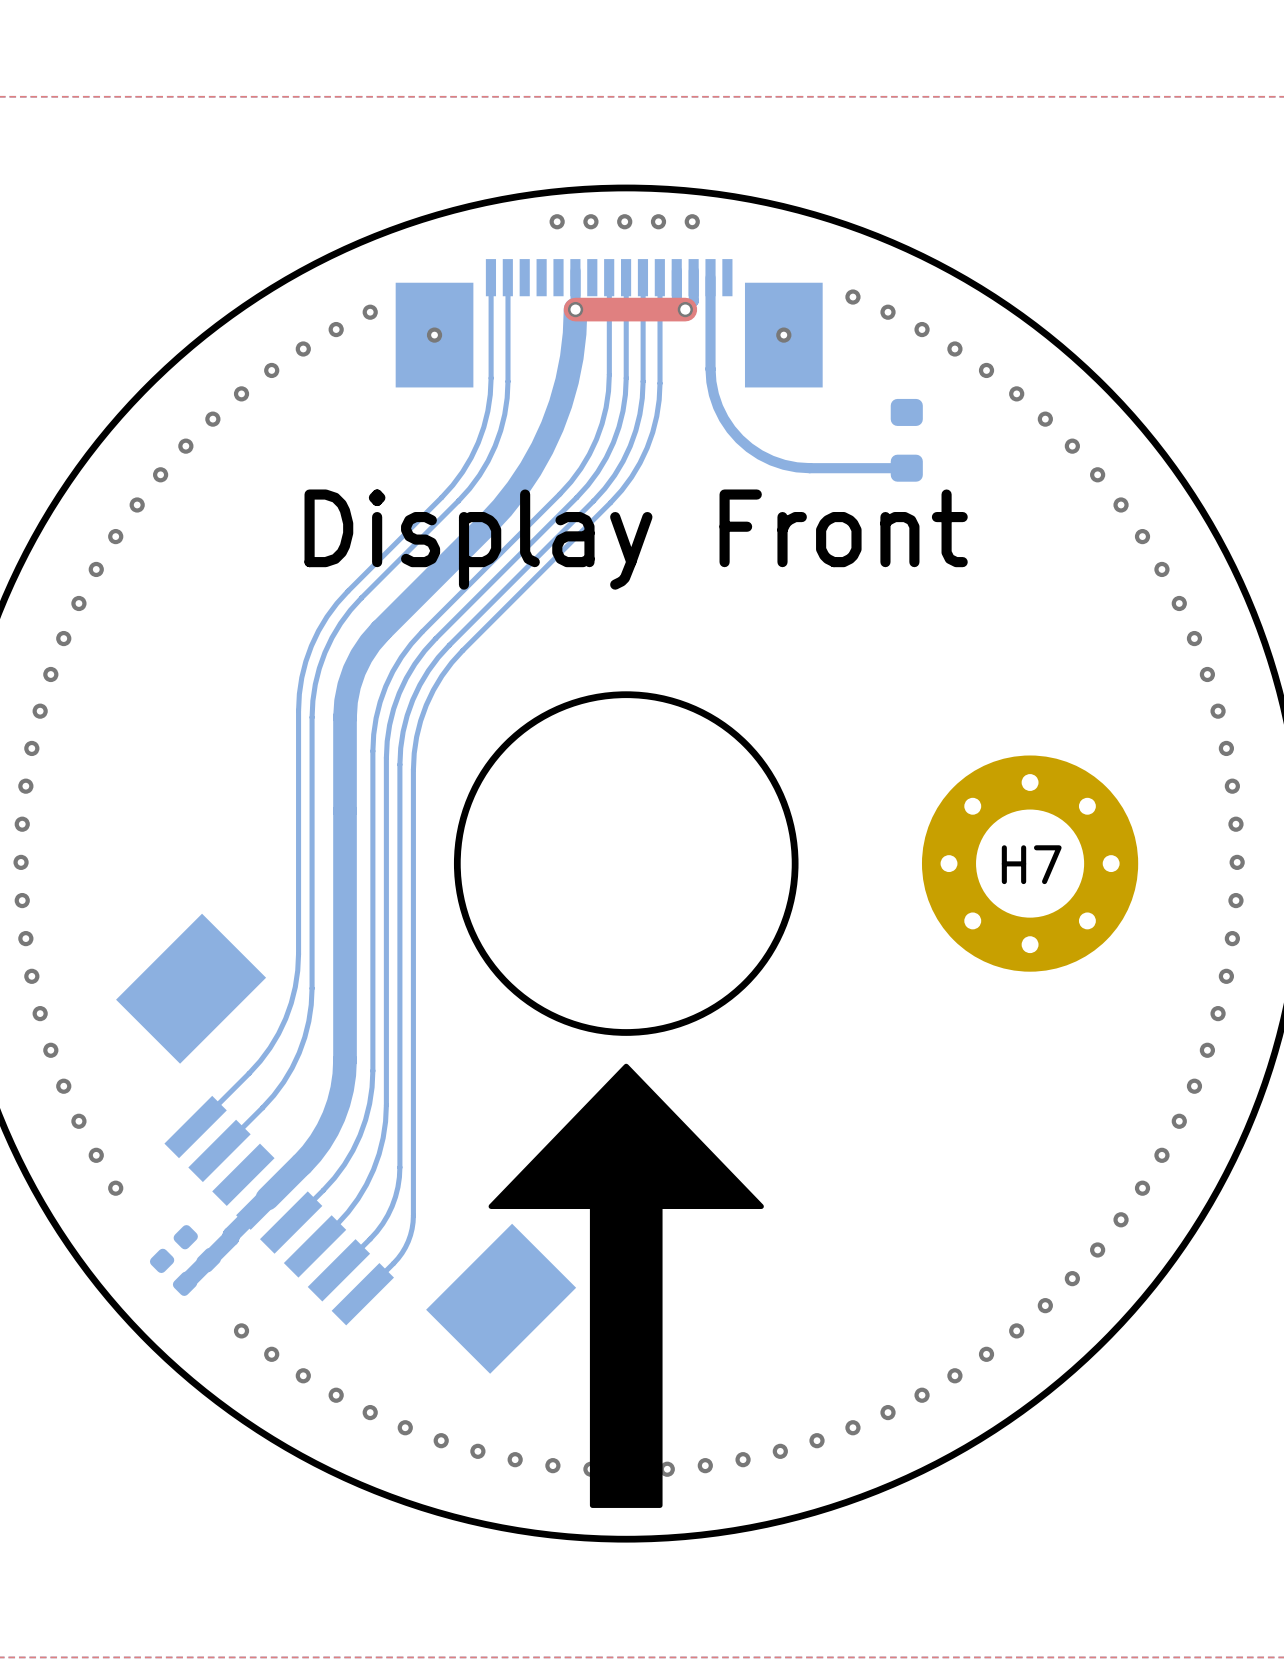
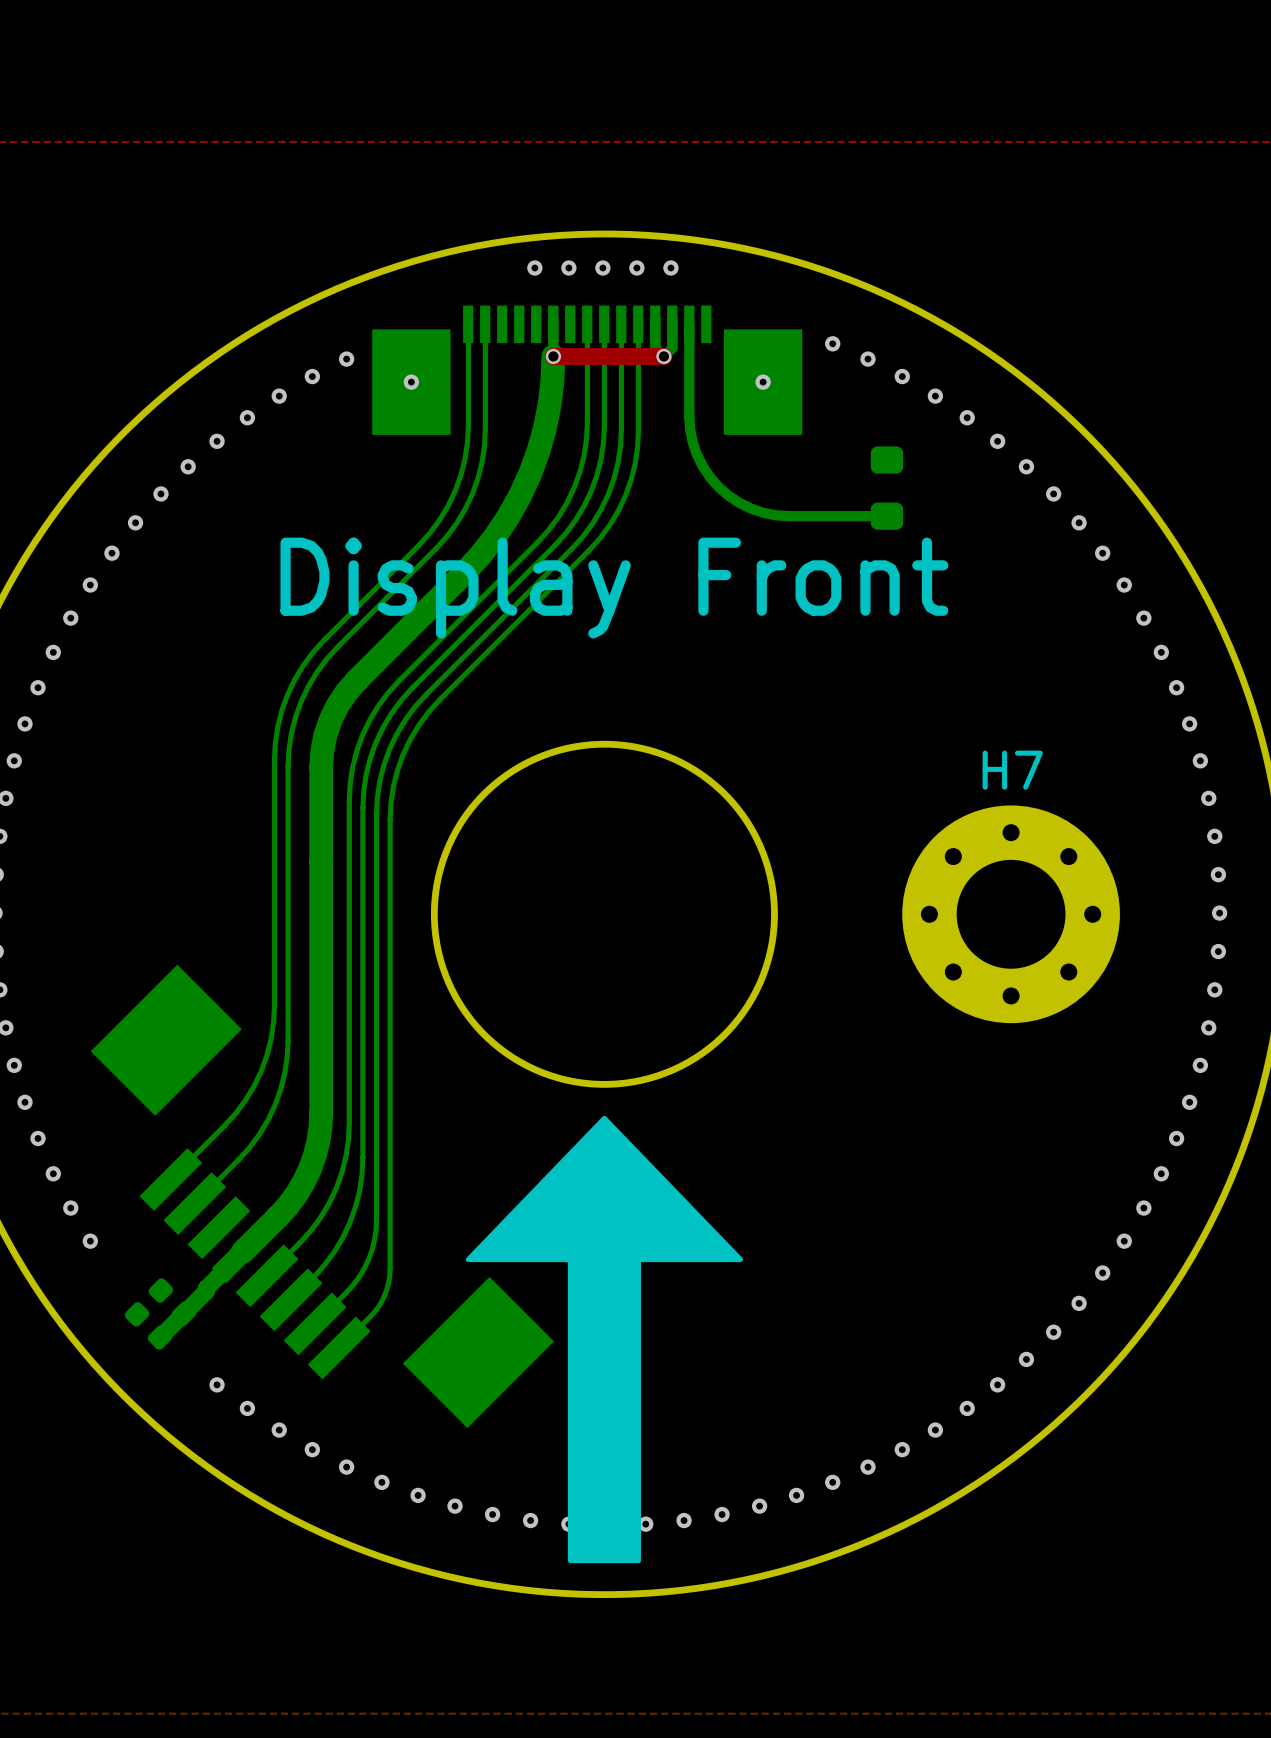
top track width: thick (575, 309) (685, 309) -> thin (553, 356) (663, 356)
H7 name position: H7 (1031, 864) -> H7 (1012, 770)

